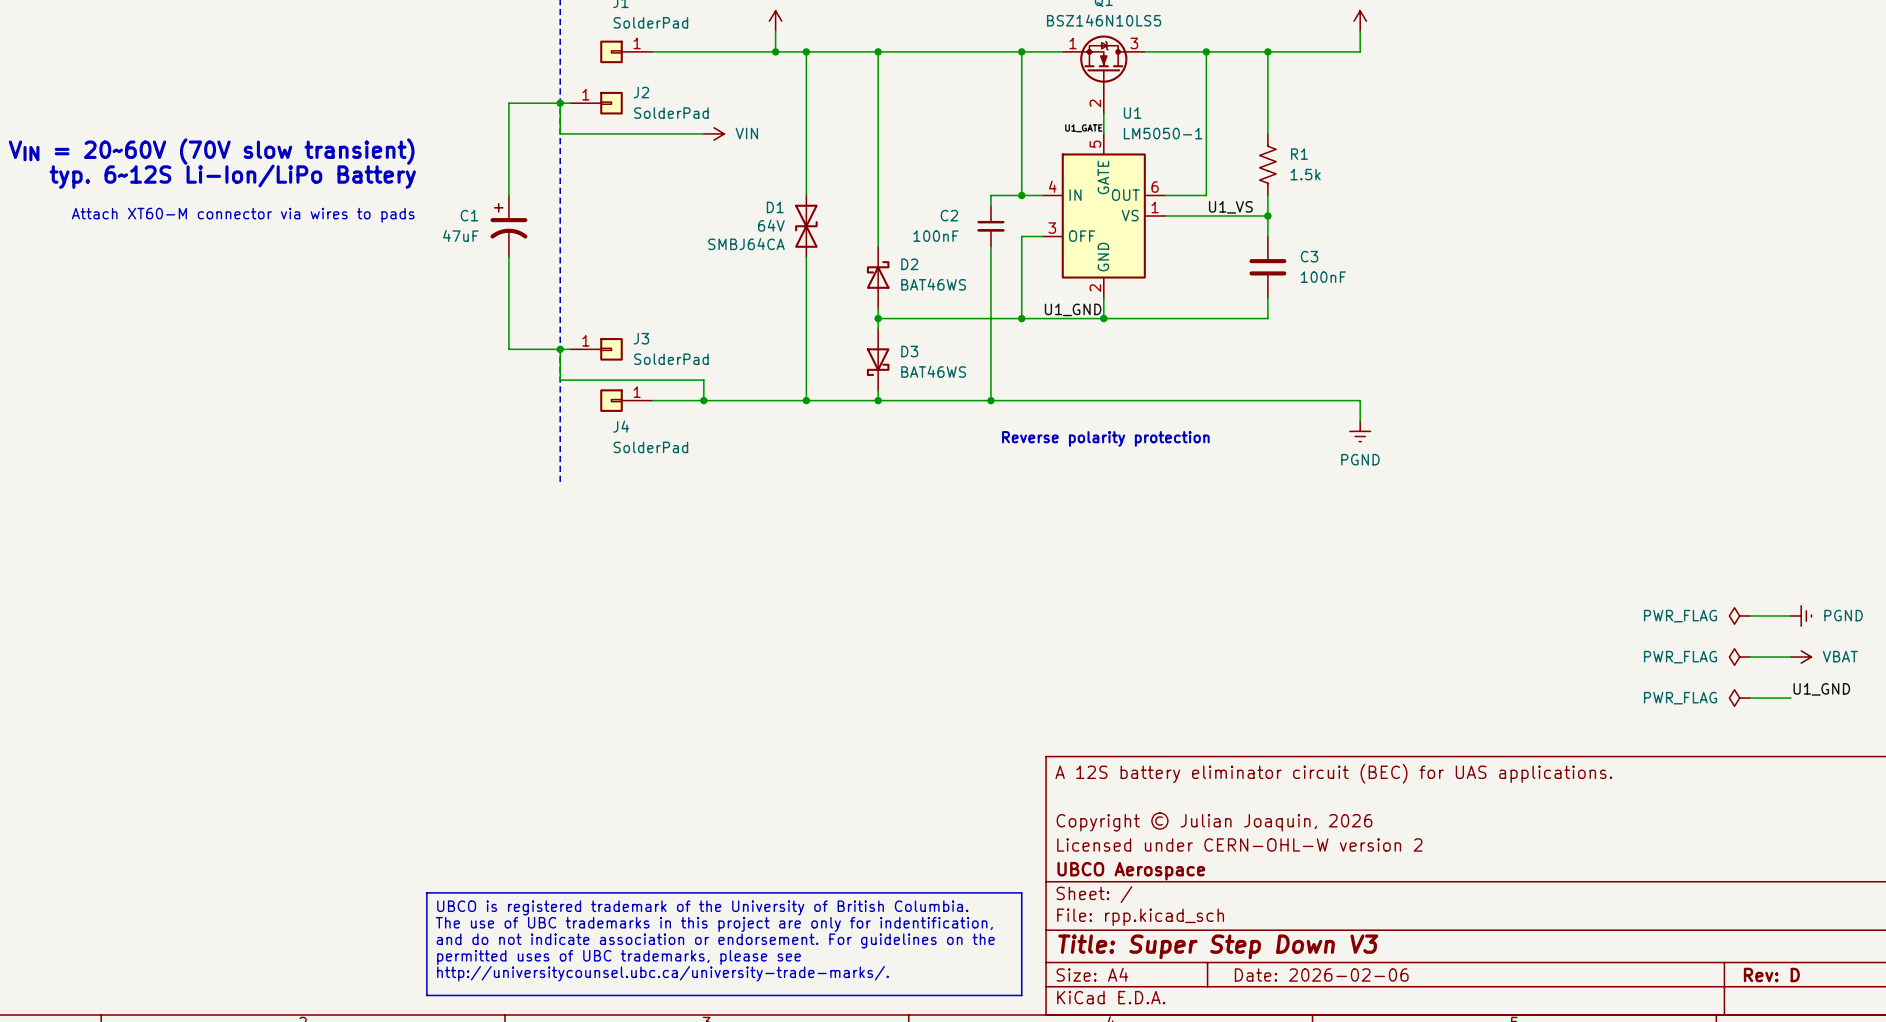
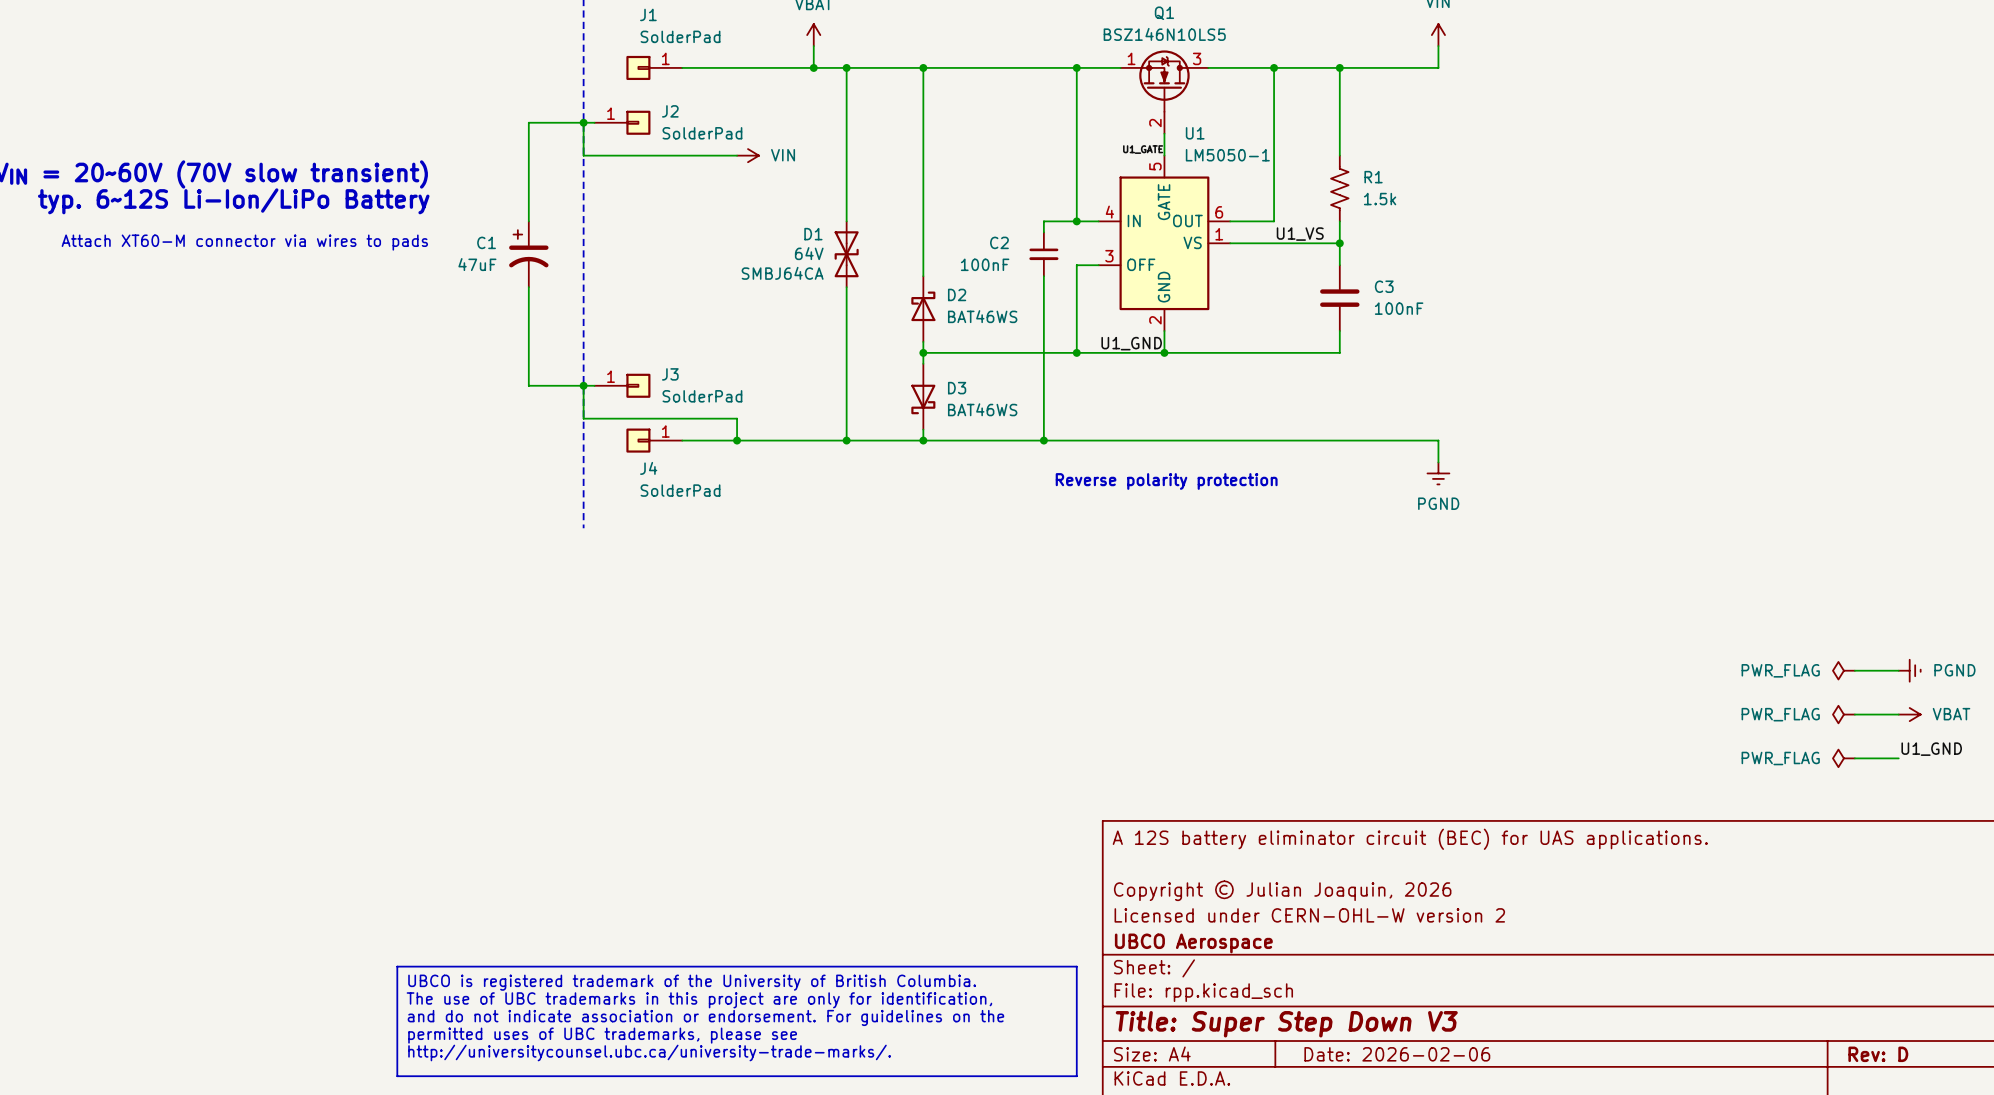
line: (426, 892) (426, 995) -> (441, 966) (397, 966) (397, 1076) (441, 1076)
text position: UBCO is registered trademark of the University of British Columbia. (702, 907) -> UBCO is registered trademark of the University of British Columbia. (692, 982)
text: The use of UBC trademarks in this project are only for indentification, (714, 924) -> The use of UBC trademarks in this project are only for identification, (699, 1000)
text position: and do not indicate association or endorsement. For guidelines on the (715, 940) -> and do not indicate association or endorsement. For guidelines on the (705, 1017)
text position: permitted uses of UBC trademarks, please see (619, 957) -> permitted uses of UBC trademarks, please see (602, 1035)
text position: http://universitycounsel.ubc.ca/university-trade-marks/. (662, 973) -> http://universitycounsel.ubc.ca/university-trade-marks/. (649, 1052)

